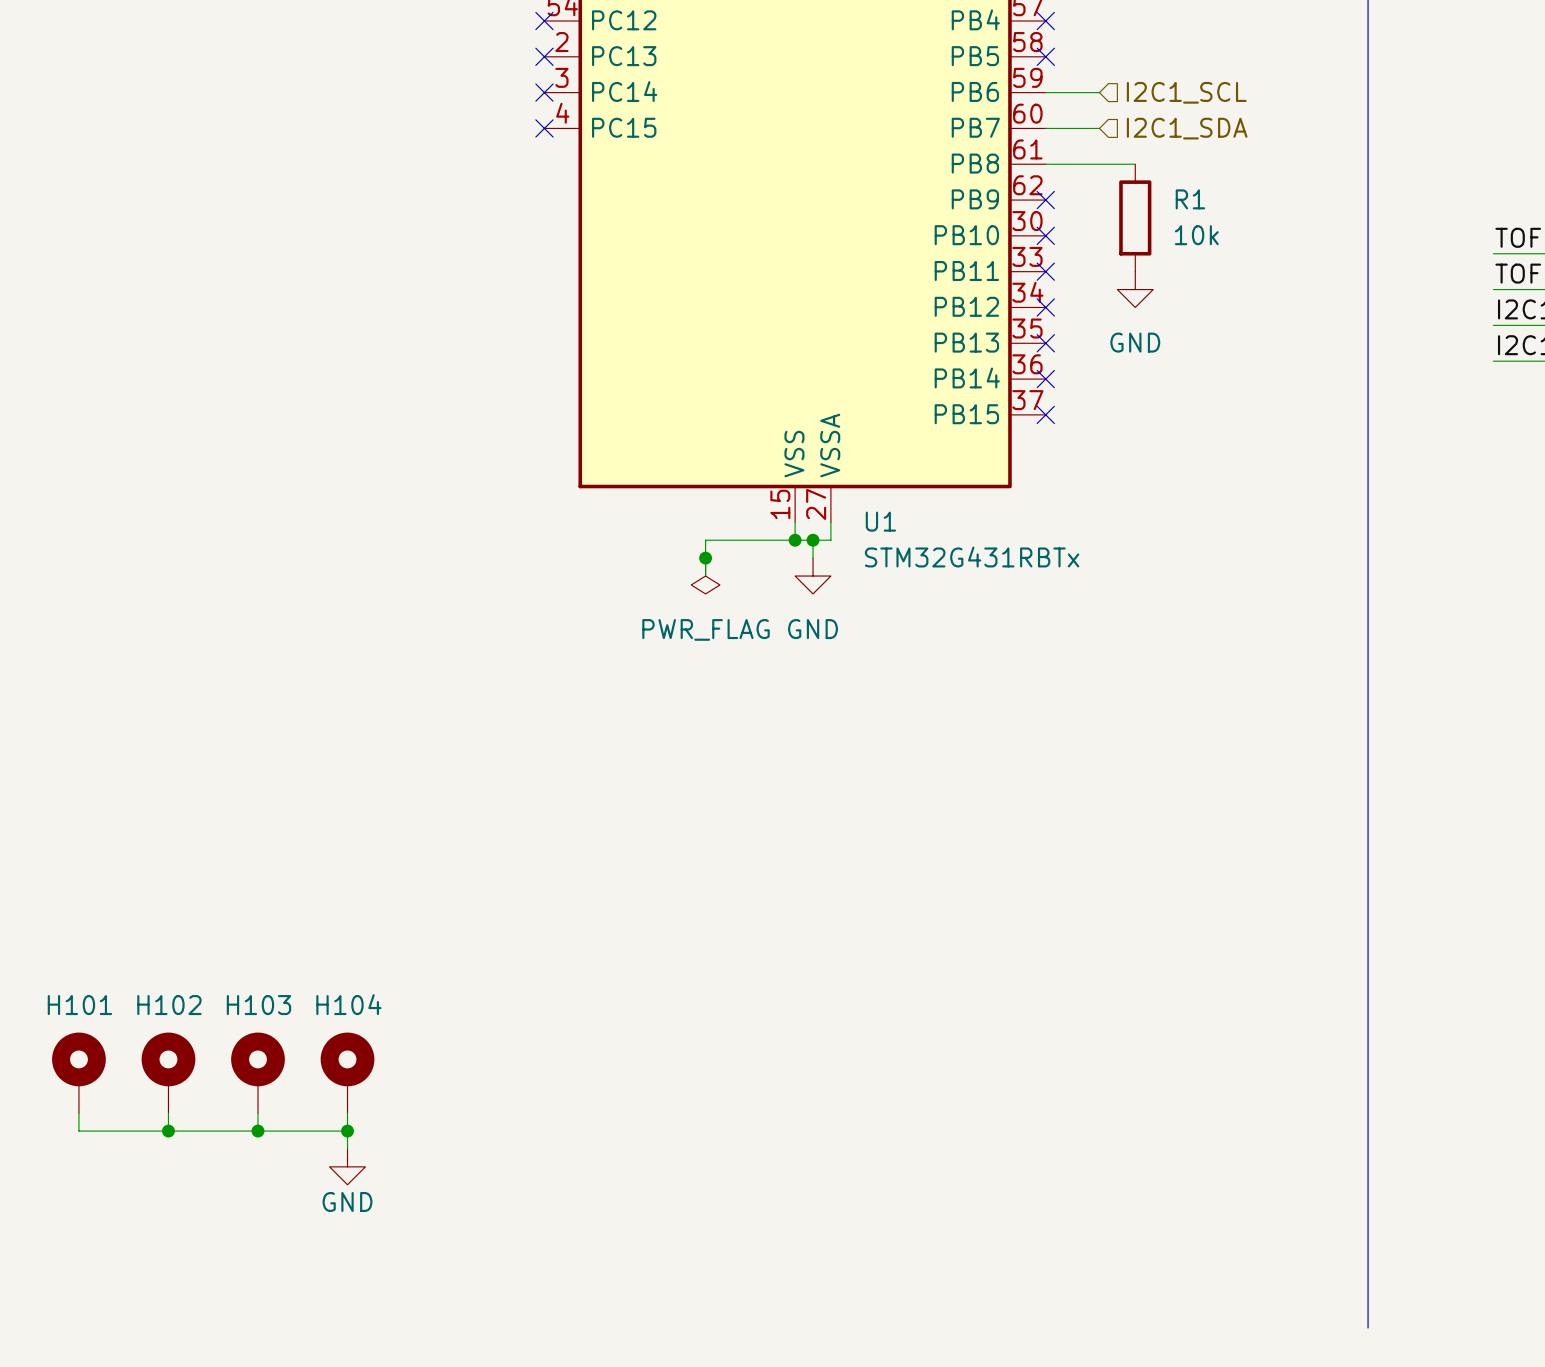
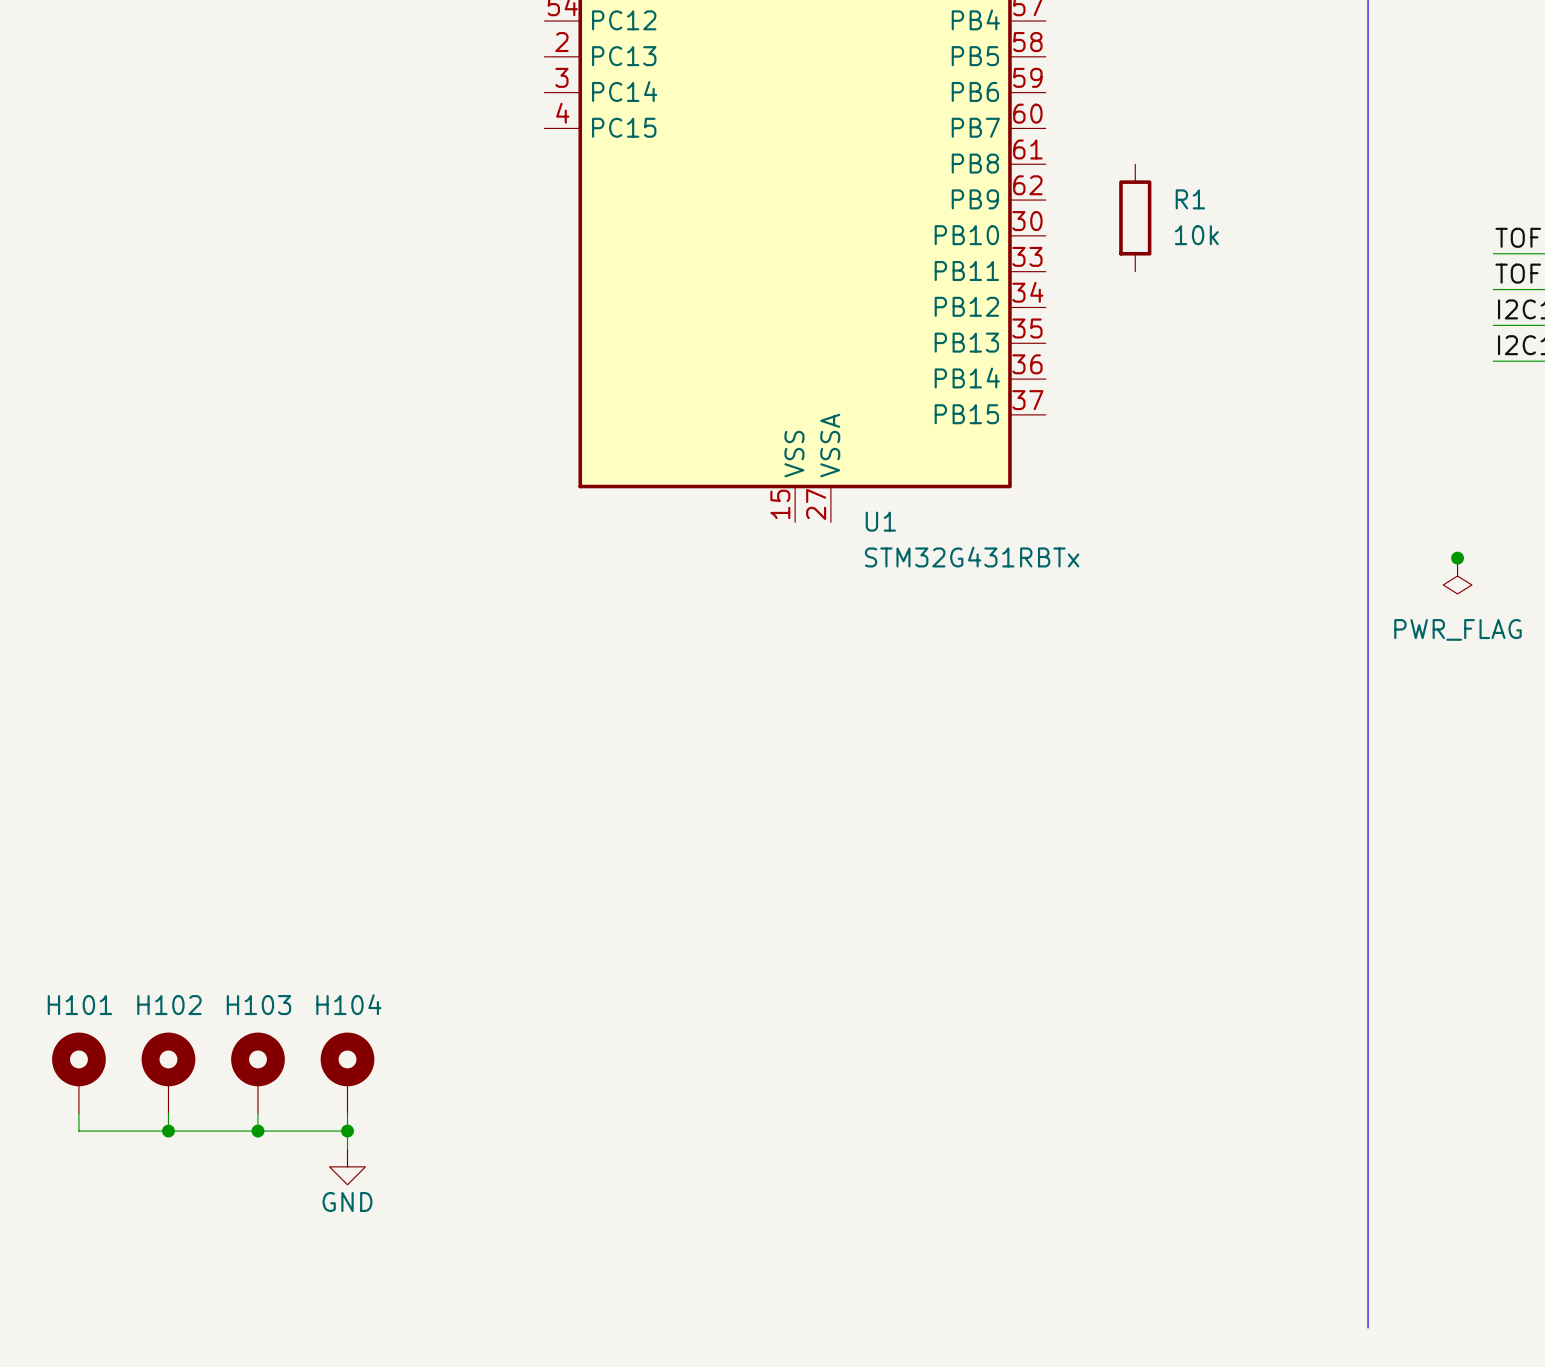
no-connect mark: (544, 21) -> none
no-connect mark: (1045, 21) -> none
no-connect mark: (544, 56) -> none
no-connect mark: (1045, 56) -> none
no-connect mark: (544, 92) -> none
wire: (1045, 92) (1099, 92) -> none
hierarchical label: I2C1_SCL (1186, 92) -> none
no-connect mark: (544, 128) -> none
wire: (1045, 128) (1099, 128) -> none
hierarchical label: I2C1_SDA (1187, 128) -> none
wire: (1045, 164) (1135, 164) -> none
no-connect mark: (1045, 200) -> none
no-connect mark: (1045, 235) -> none
no-connect mark: (1045, 271) -> none
power symbol: GND (1135, 289) -> none
no-connect mark: (1045, 307) -> none
no-connect mark: (1045, 343) -> none
no-connect mark: (1045, 379) -> none
no-connect mark: (1045, 414) -> none
wire: (795, 522) (795, 540) -> none
wire: (830, 522) (830, 540) (705, 540) (705, 576) -> none
junction: (795, 540) -> none
wire: (813, 540) (813, 558) -> none
junction: (813, 540) -> none
junction: (705, 558) -> none
junction: none -> (1457, 558)
power symbol: PWR_FLAG (705, 576) -> none
power symbol: GND (813, 576) -> none
power symbol: none -> PWR_FLAG (1457, 576)

